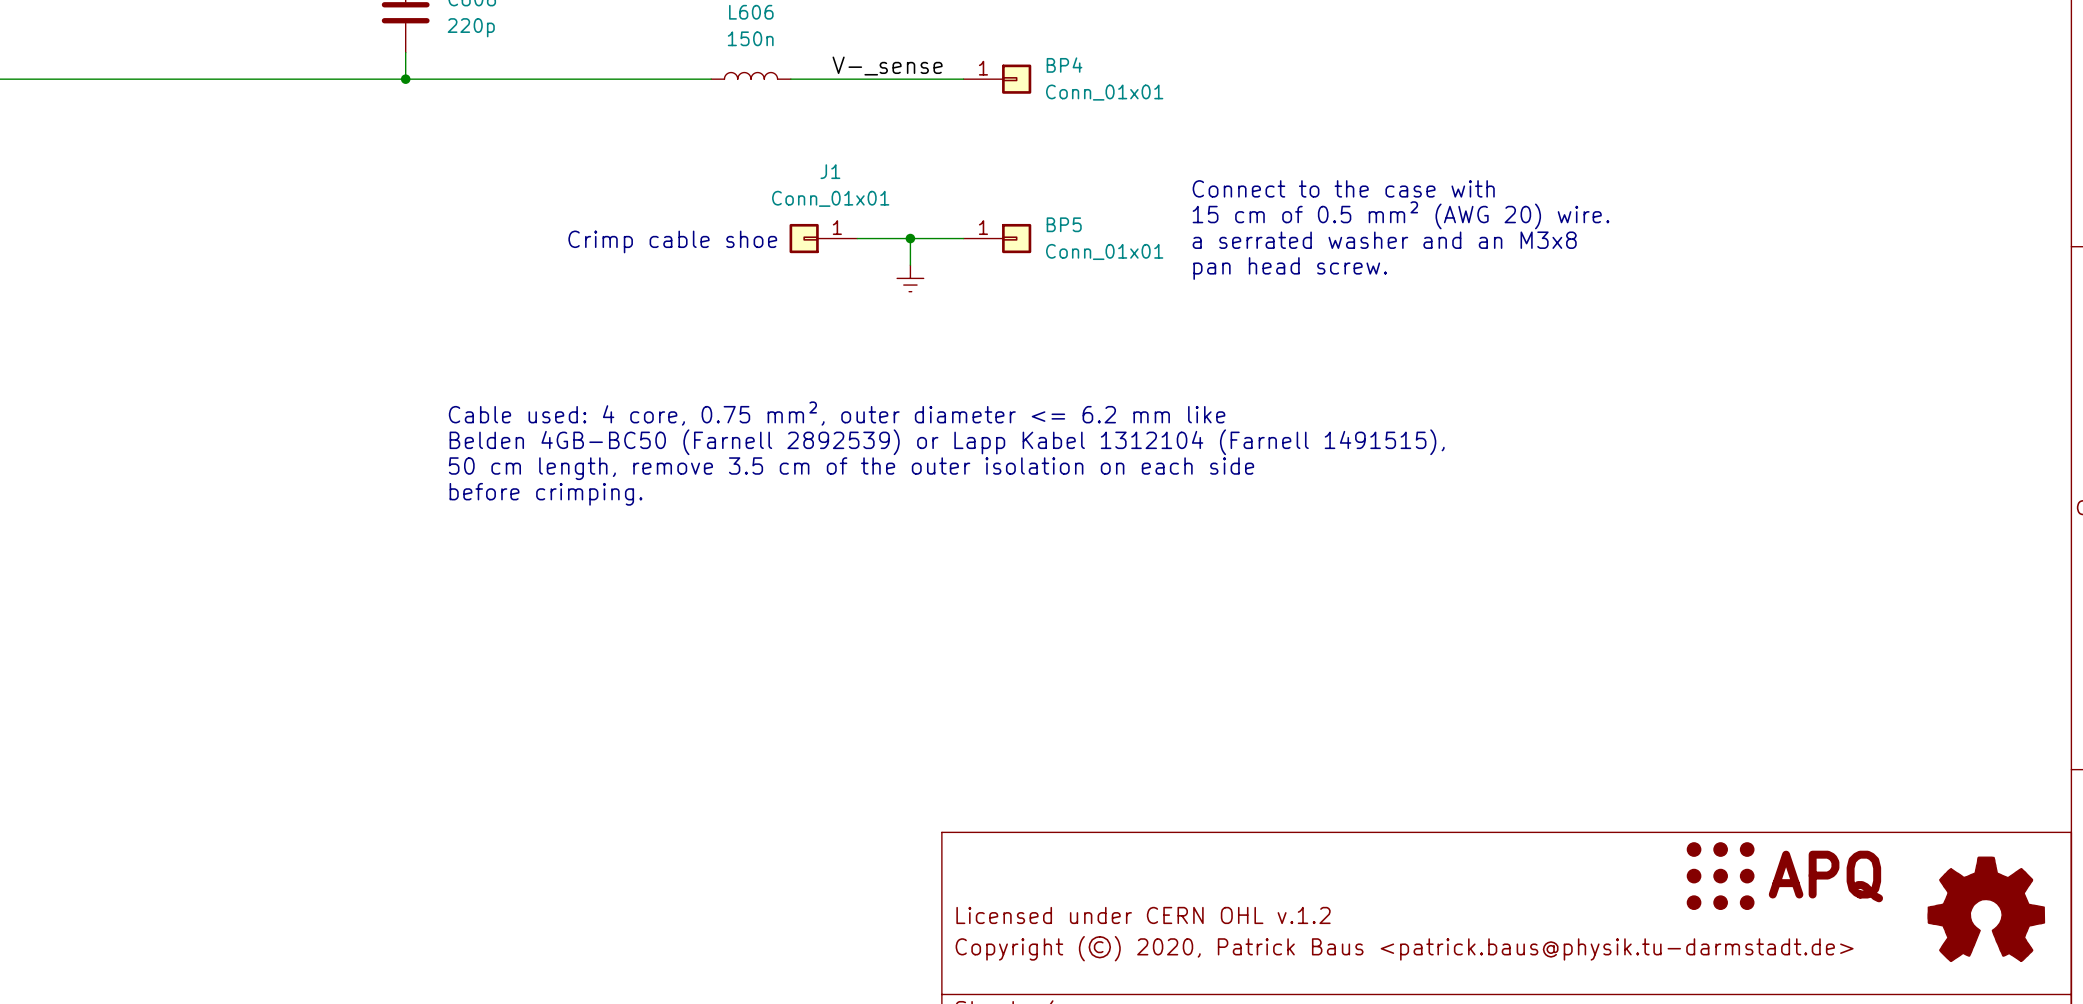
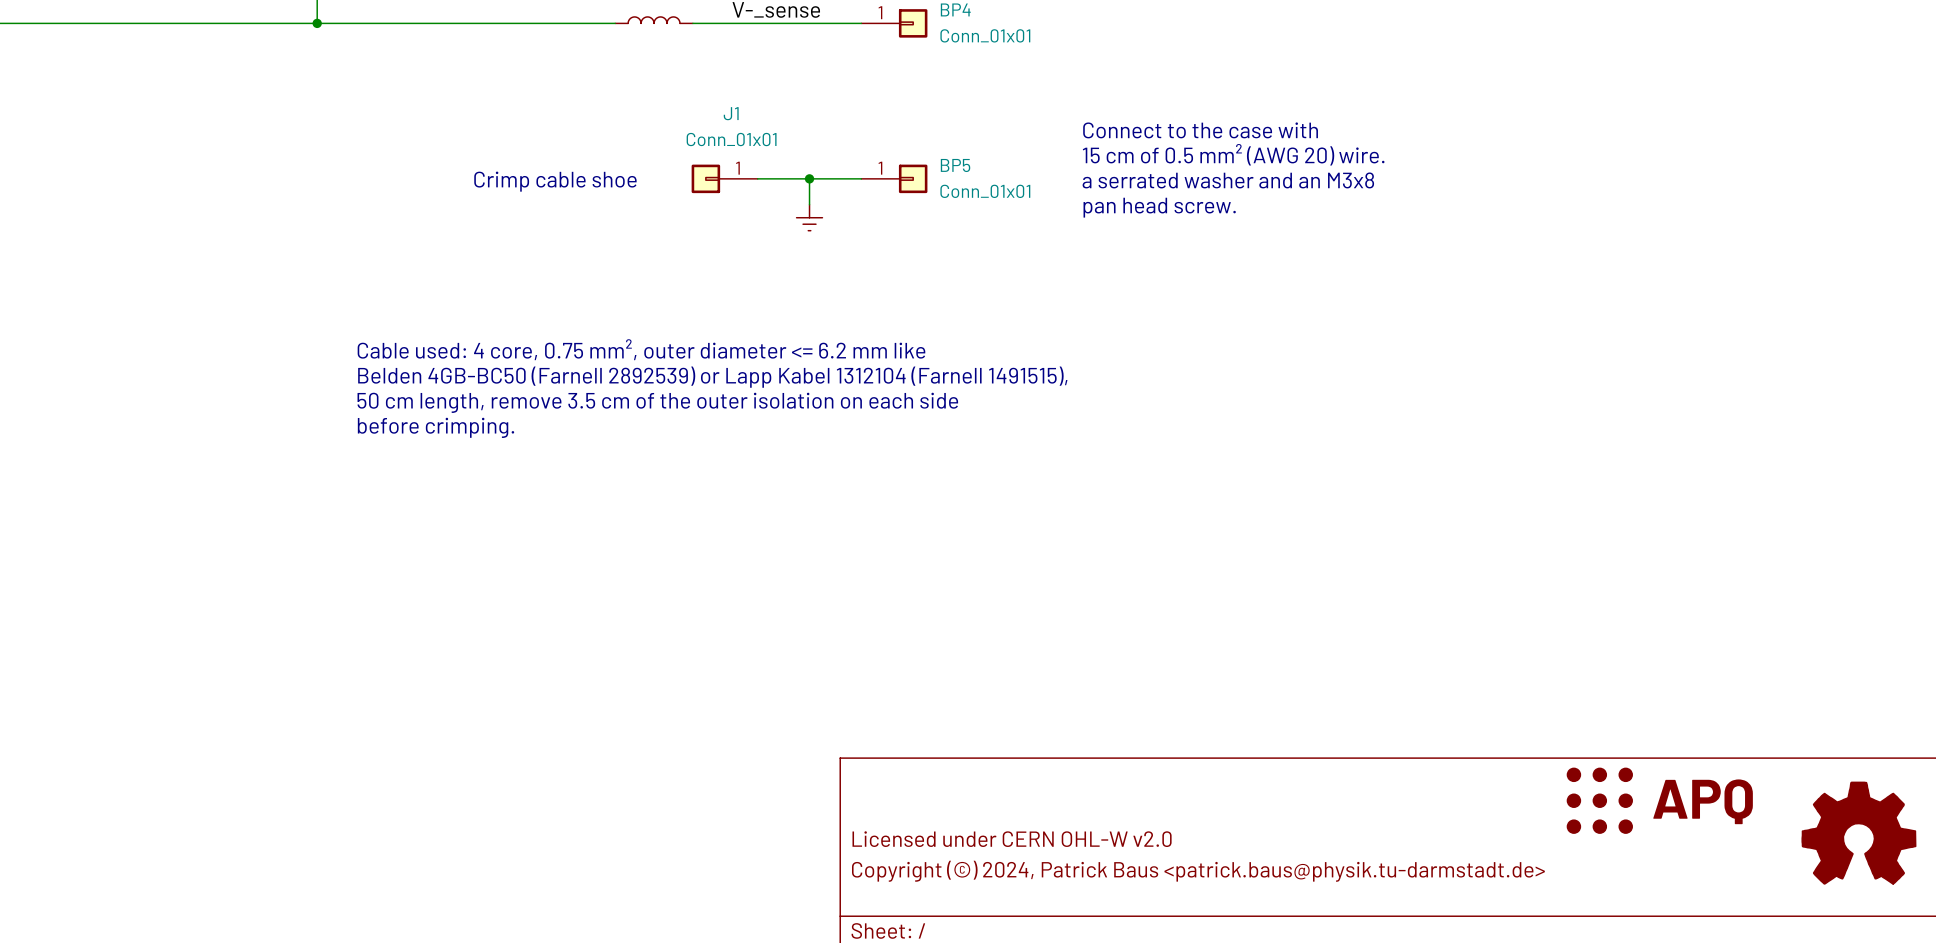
title block: Licensed under CERN OHL v.1.2 (1143, 915) -> Licensed under CERN OHL-W v2.0 (1012, 839)
title block: Copyright (©) 2020, Patrick Baus <patrick.baus@physik.tu-darmstadt.de> (1404, 948) -> Copyright (©) 2024, Patrick Baus <patrick.baus@physik.tu-darmstadt.de> (1198, 871)

